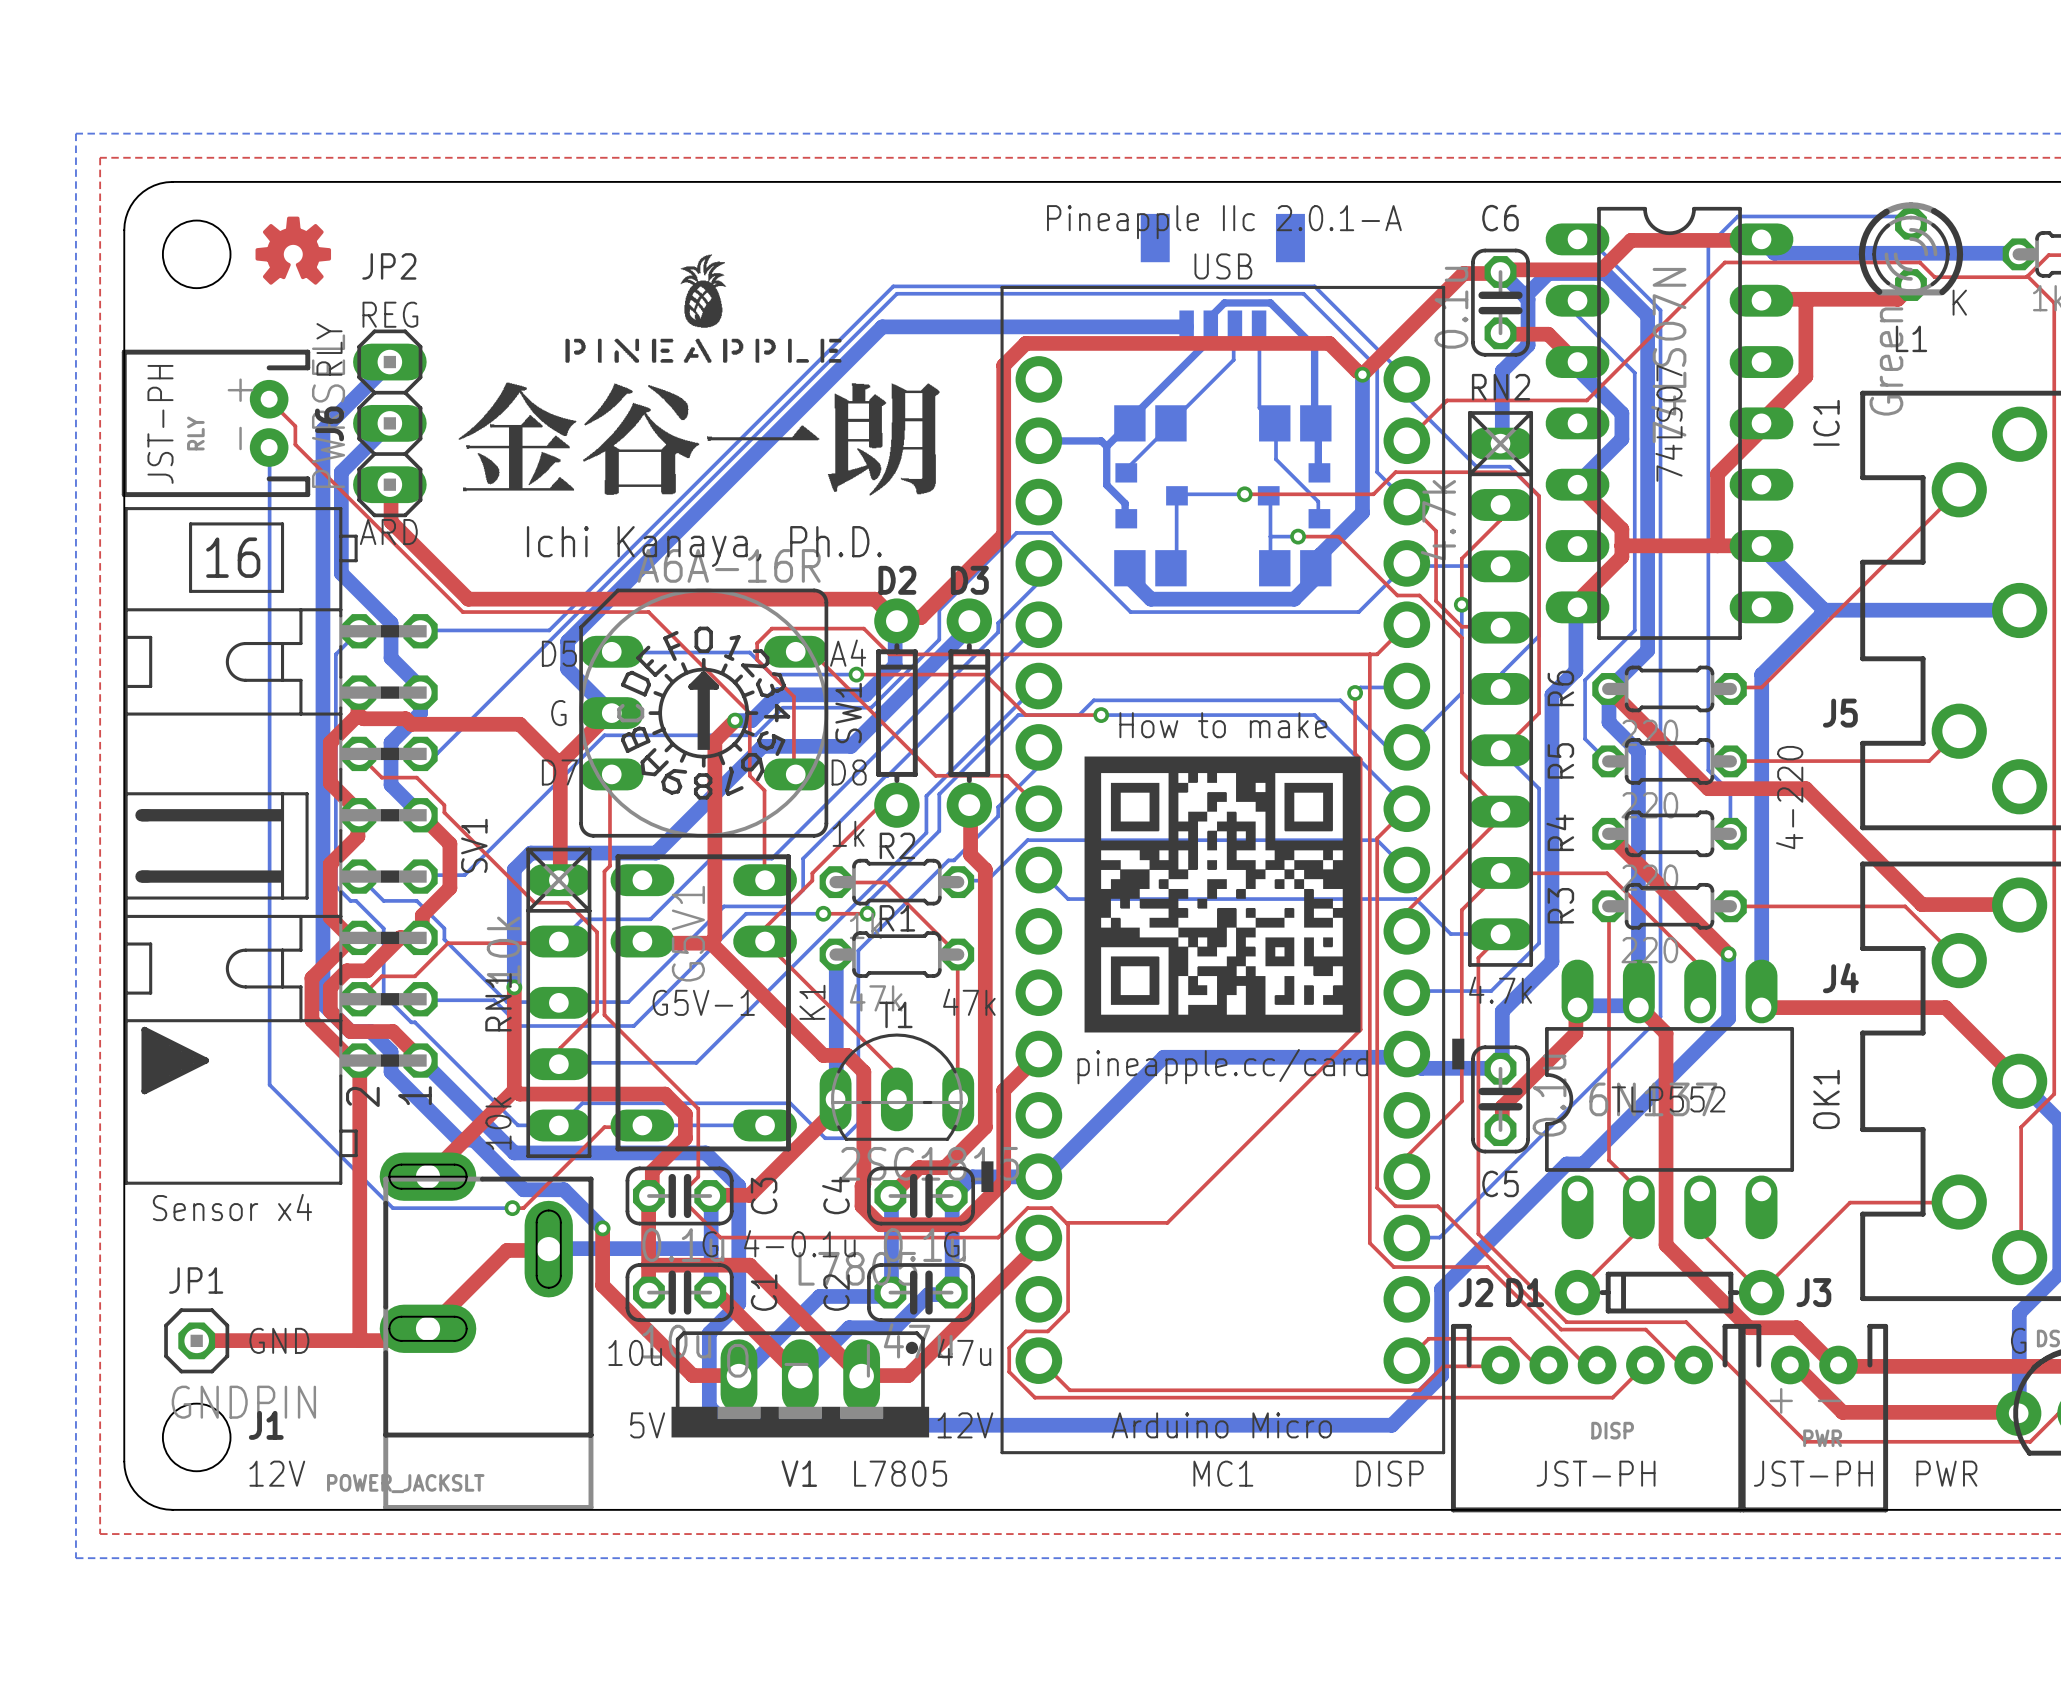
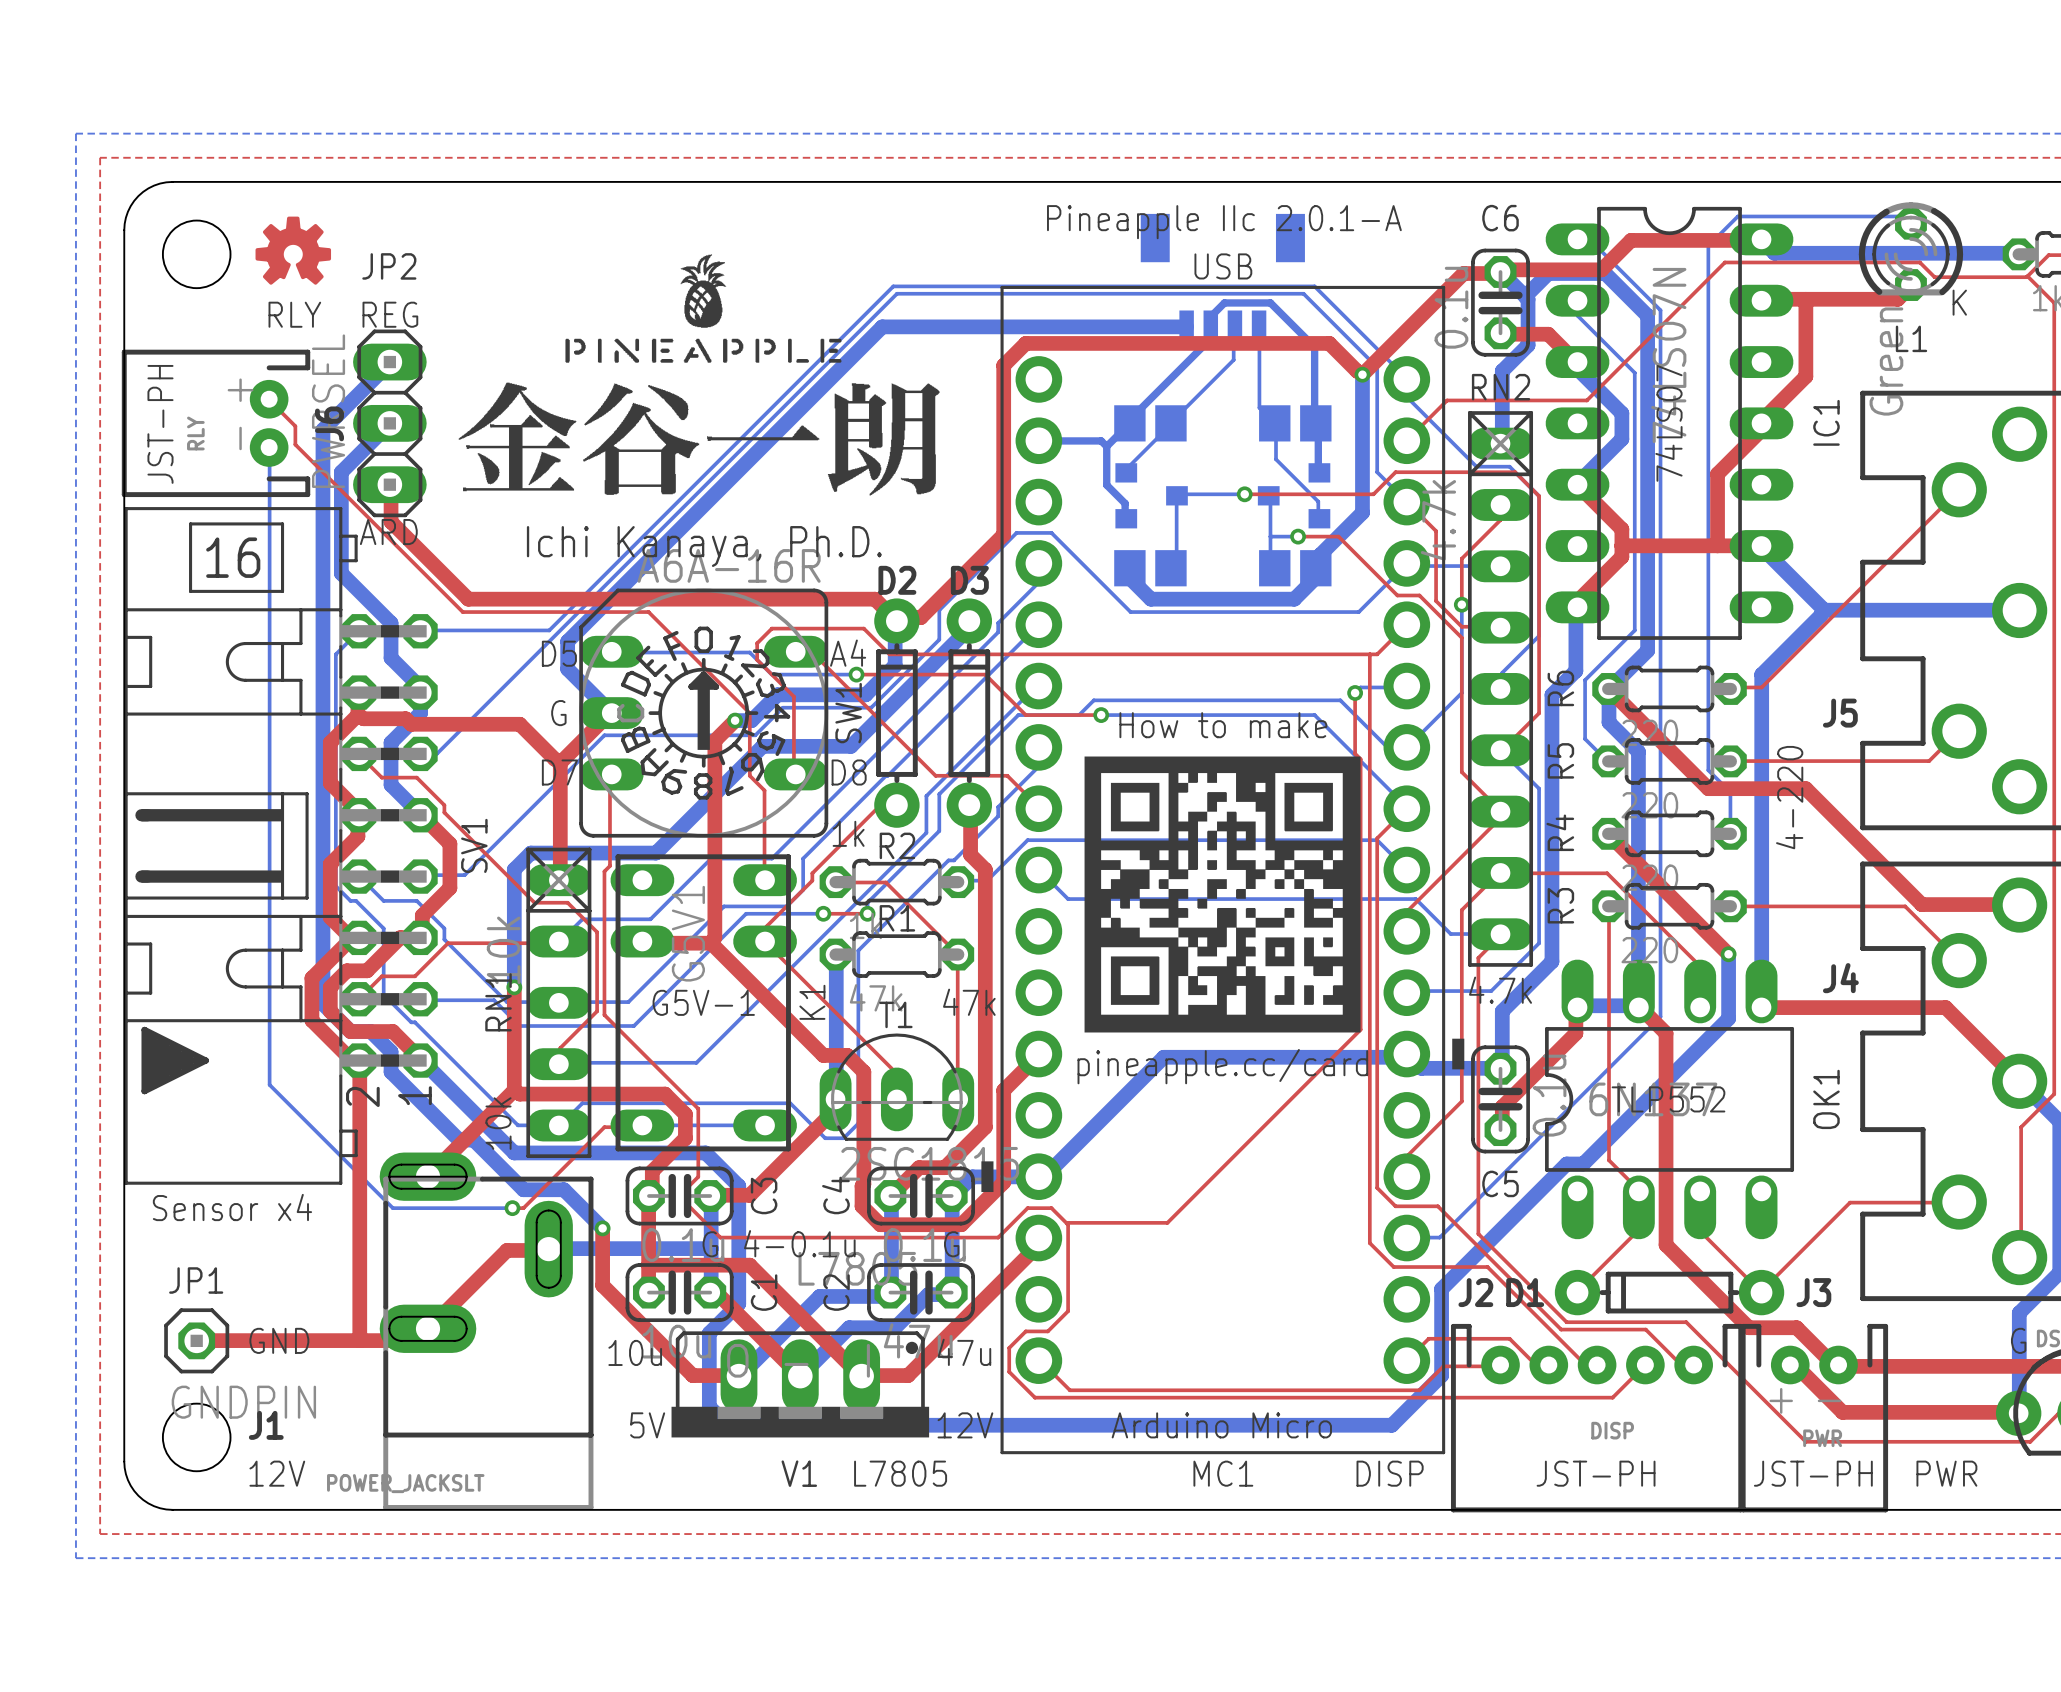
text rotation: 0° (329, 349) -> 90° clockwise (294, 314)

